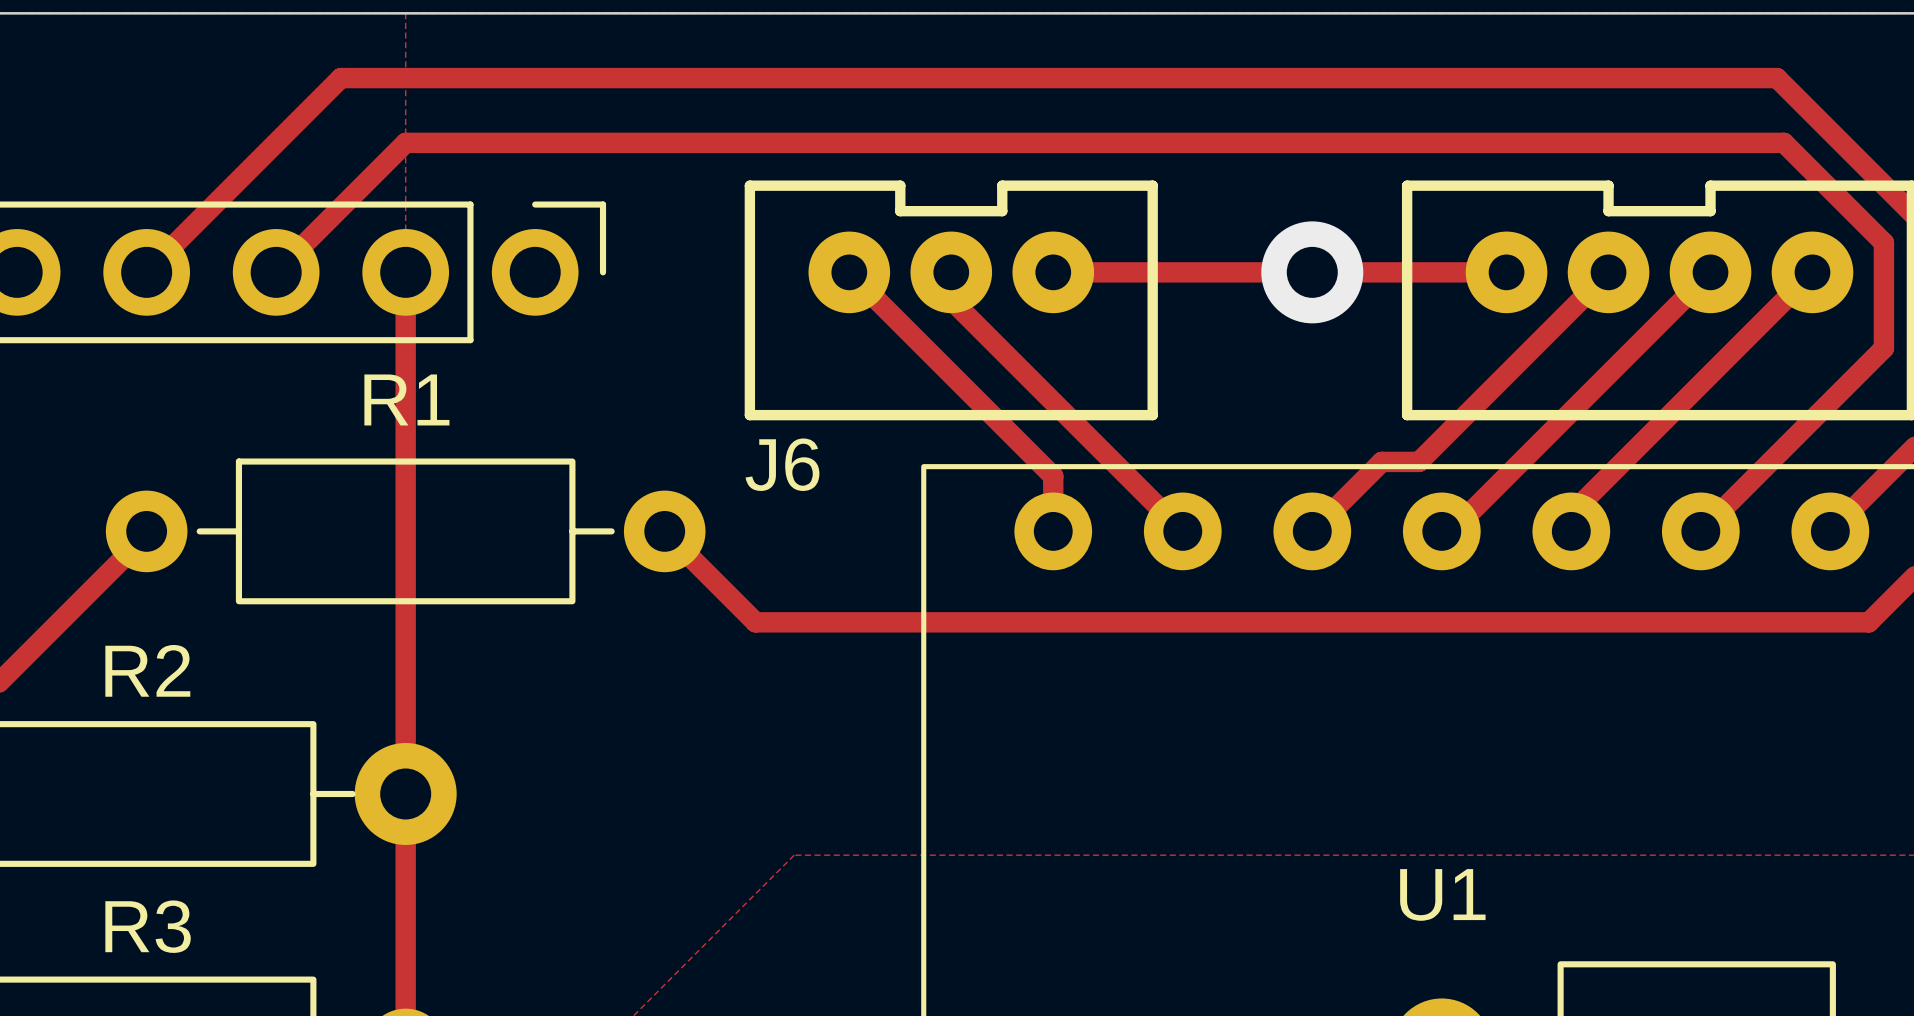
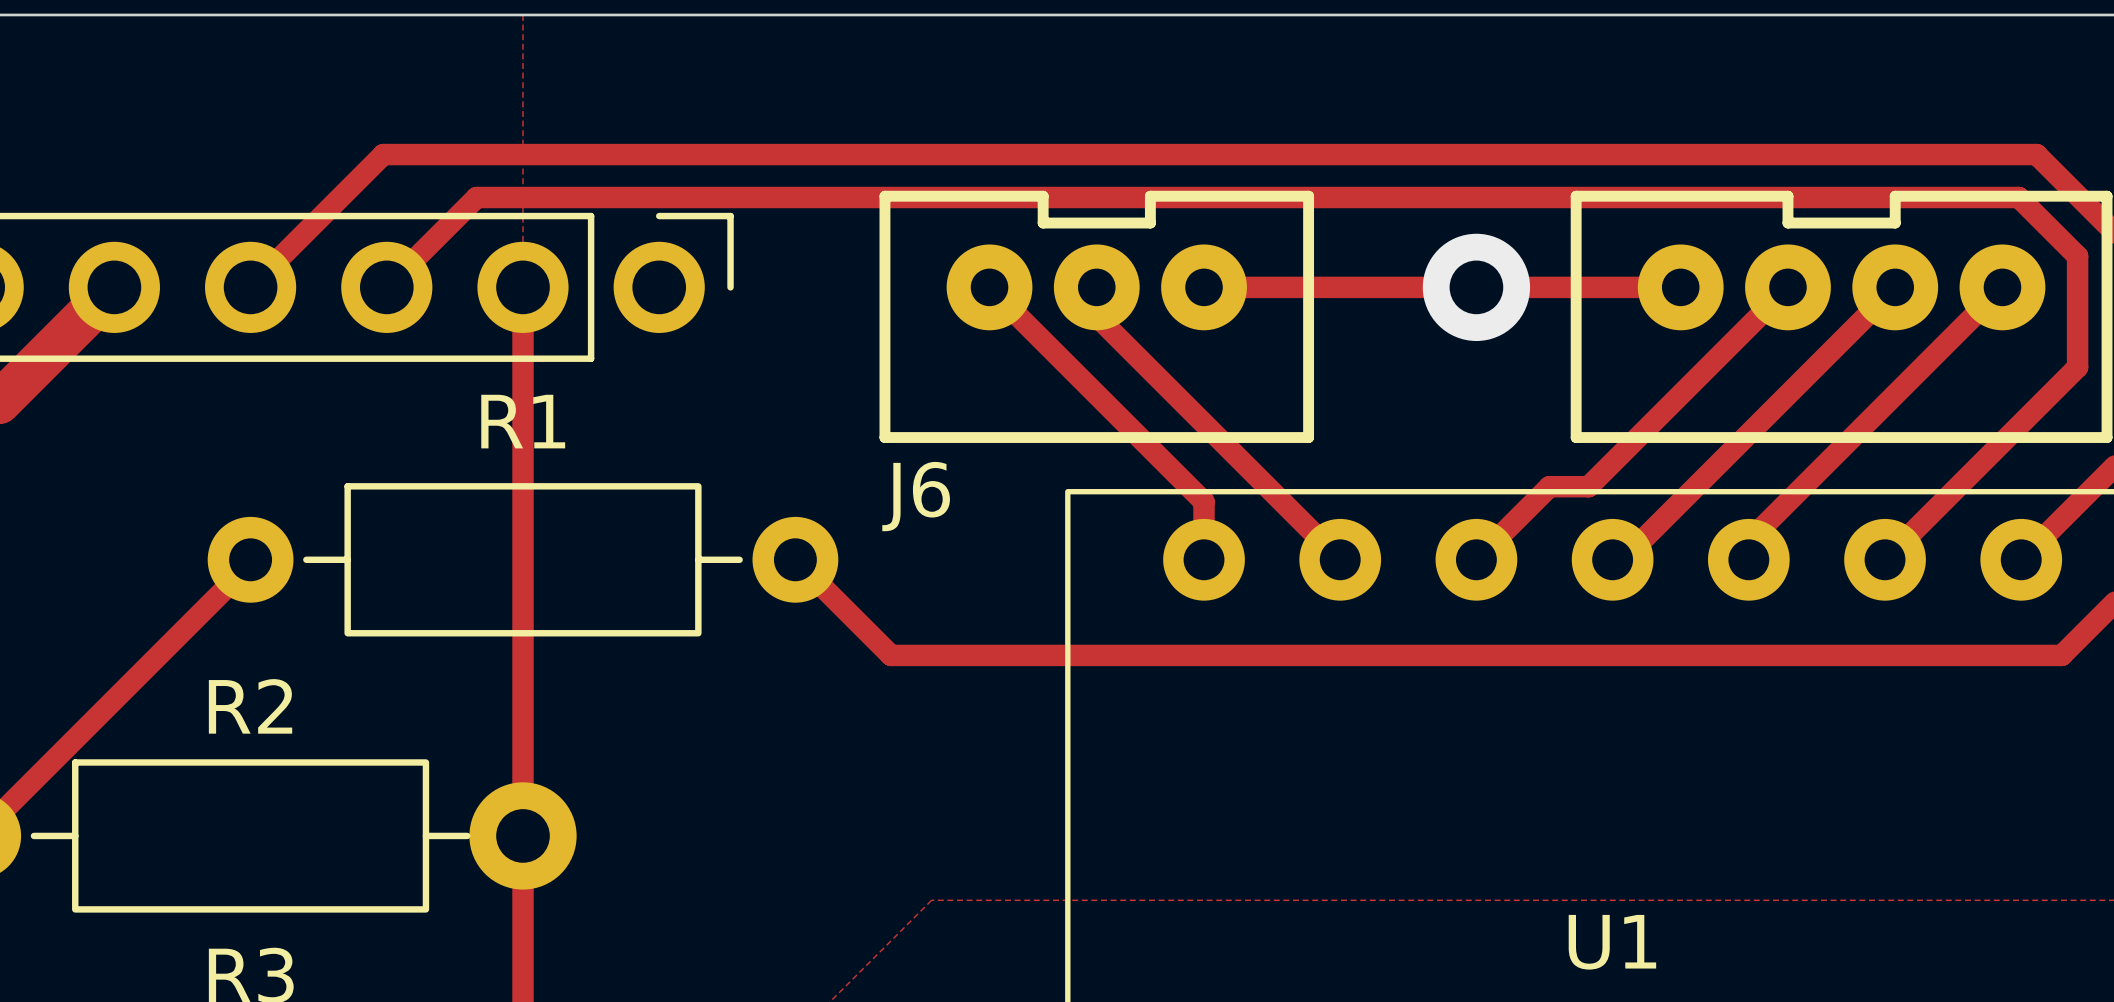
top track: (272, 146) (340, 78) (1777, 78) (1844, 146) -> (383, 154) (2036, 154)
top track: (361, 186) (405, 142) (1784, 142) (1828, 186) -> (476, 197) (2018, 197)

